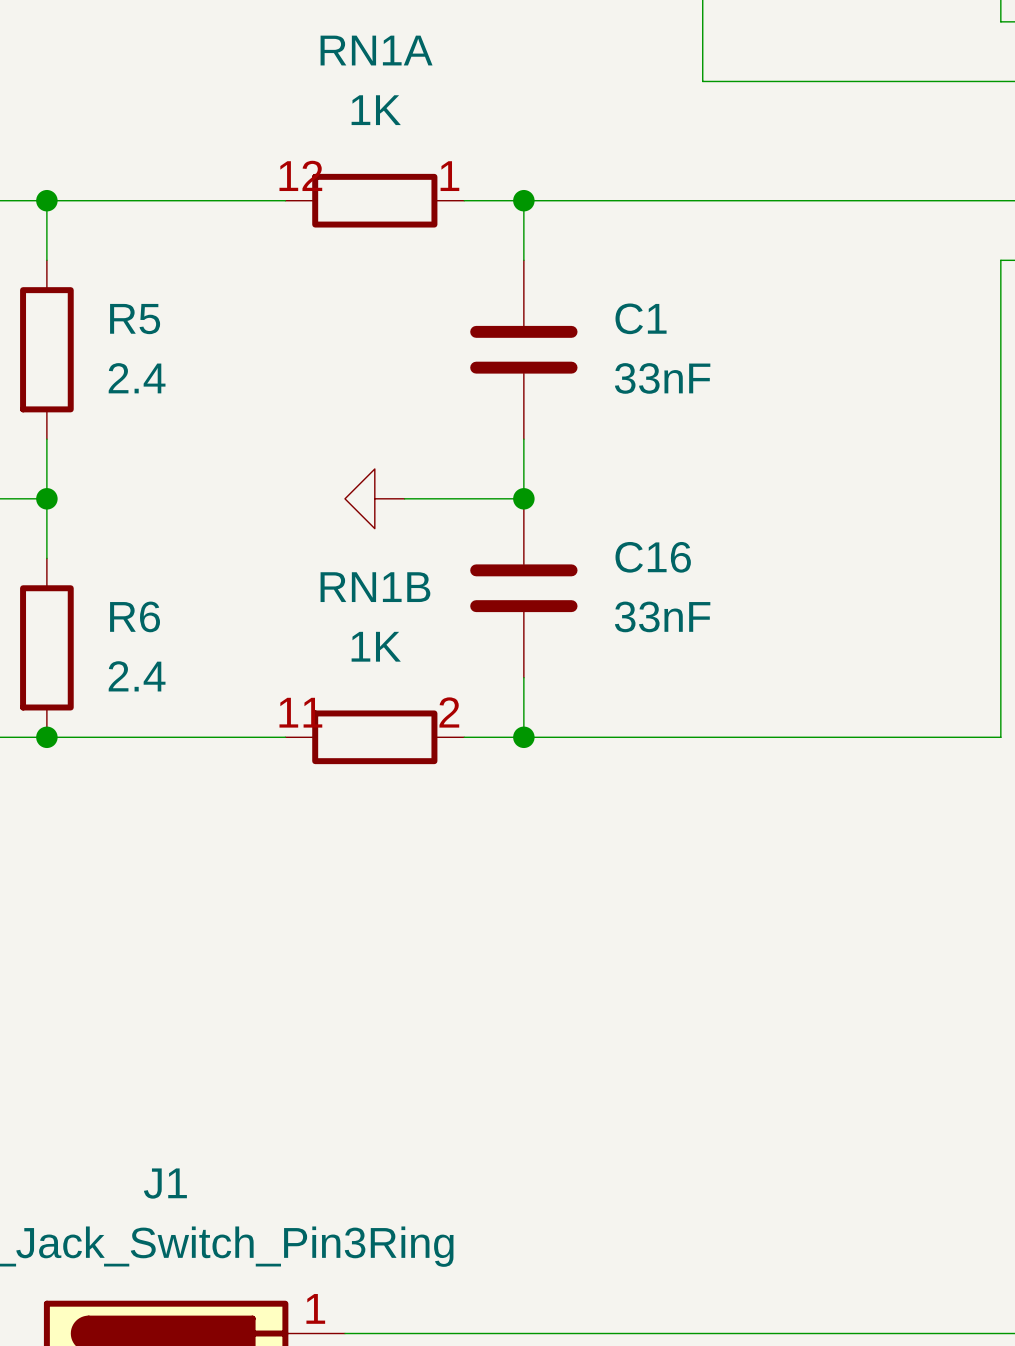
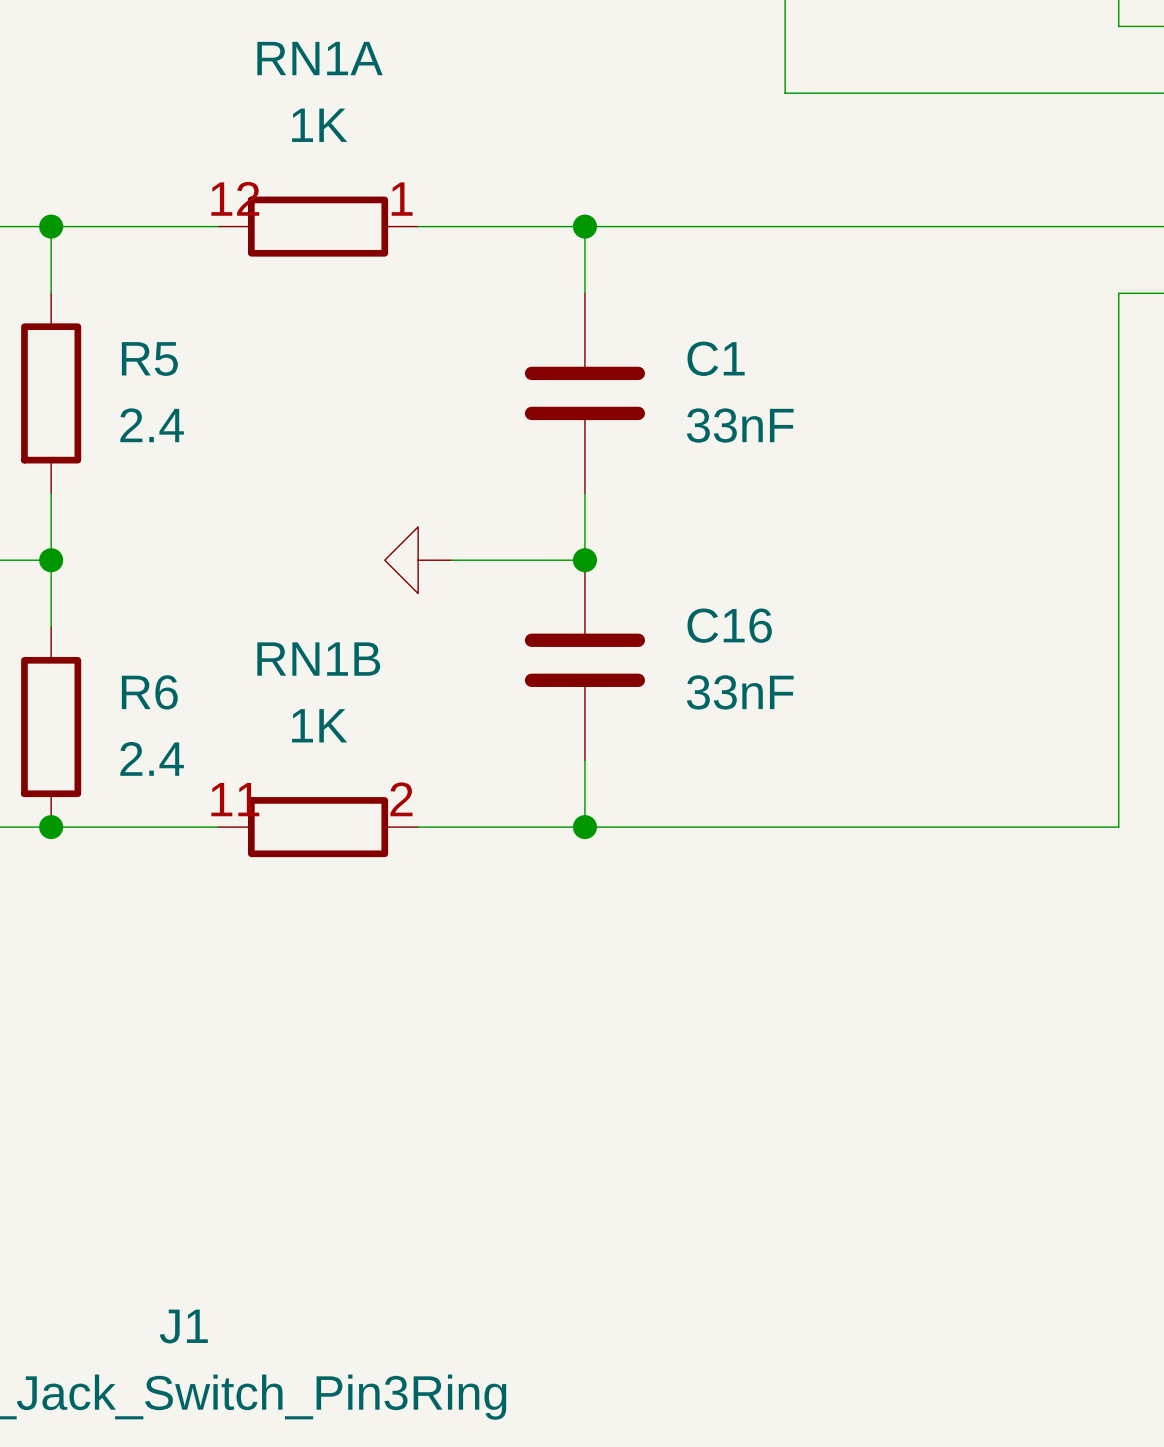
wire: (195, 200) (285, 200) -> (418, 226) (518, 226)
RN1A position: (374, 200) -> (318, 226)
wire: (195, 737) (285, 737) -> (418, 827) (518, 827)
RN1B position: (374, 737) -> (318, 827)

